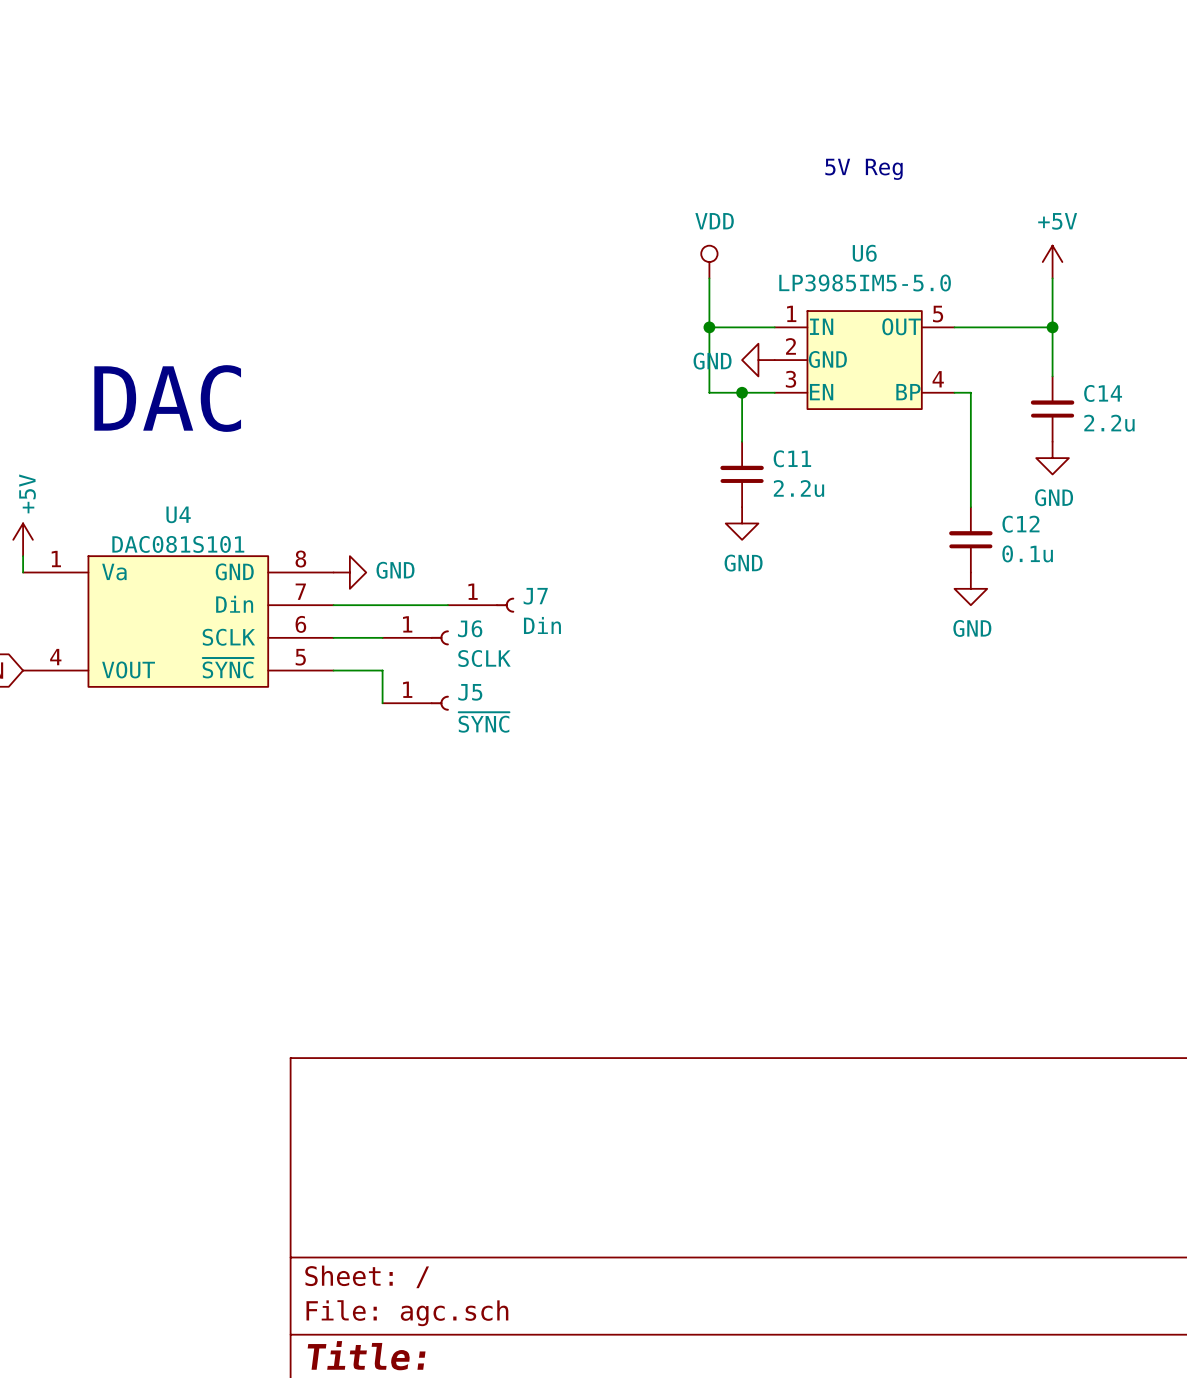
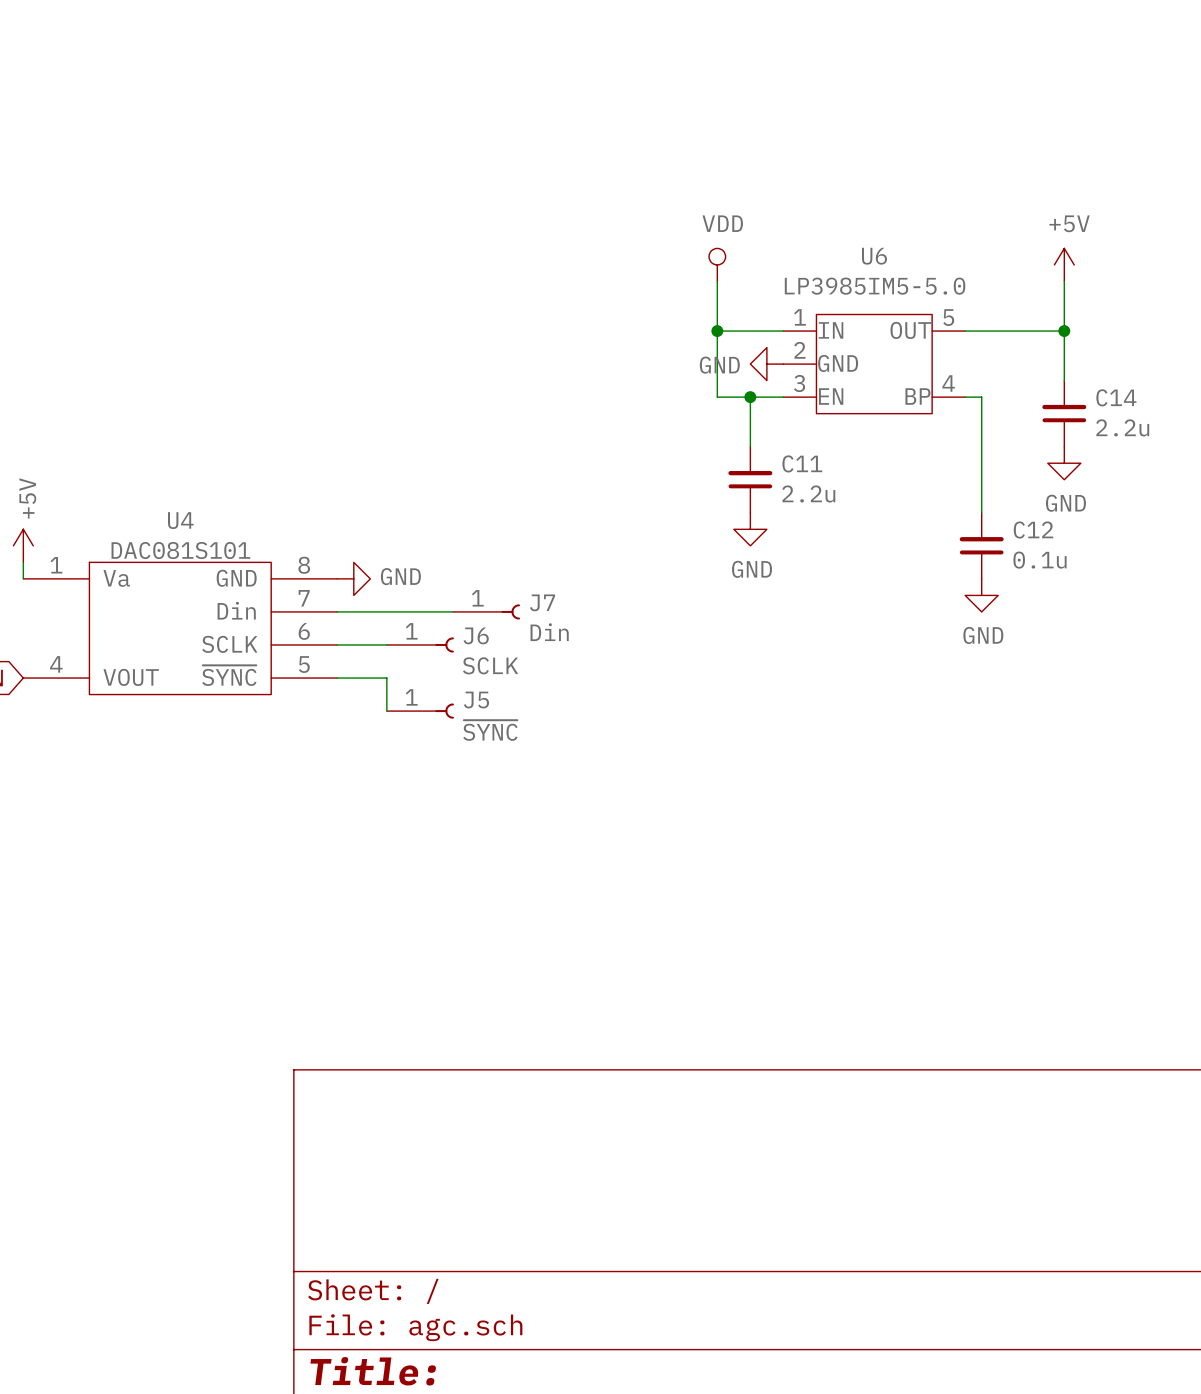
text: 5V Reg (864, 169) -> none
text: DAC (167, 398) -> none

